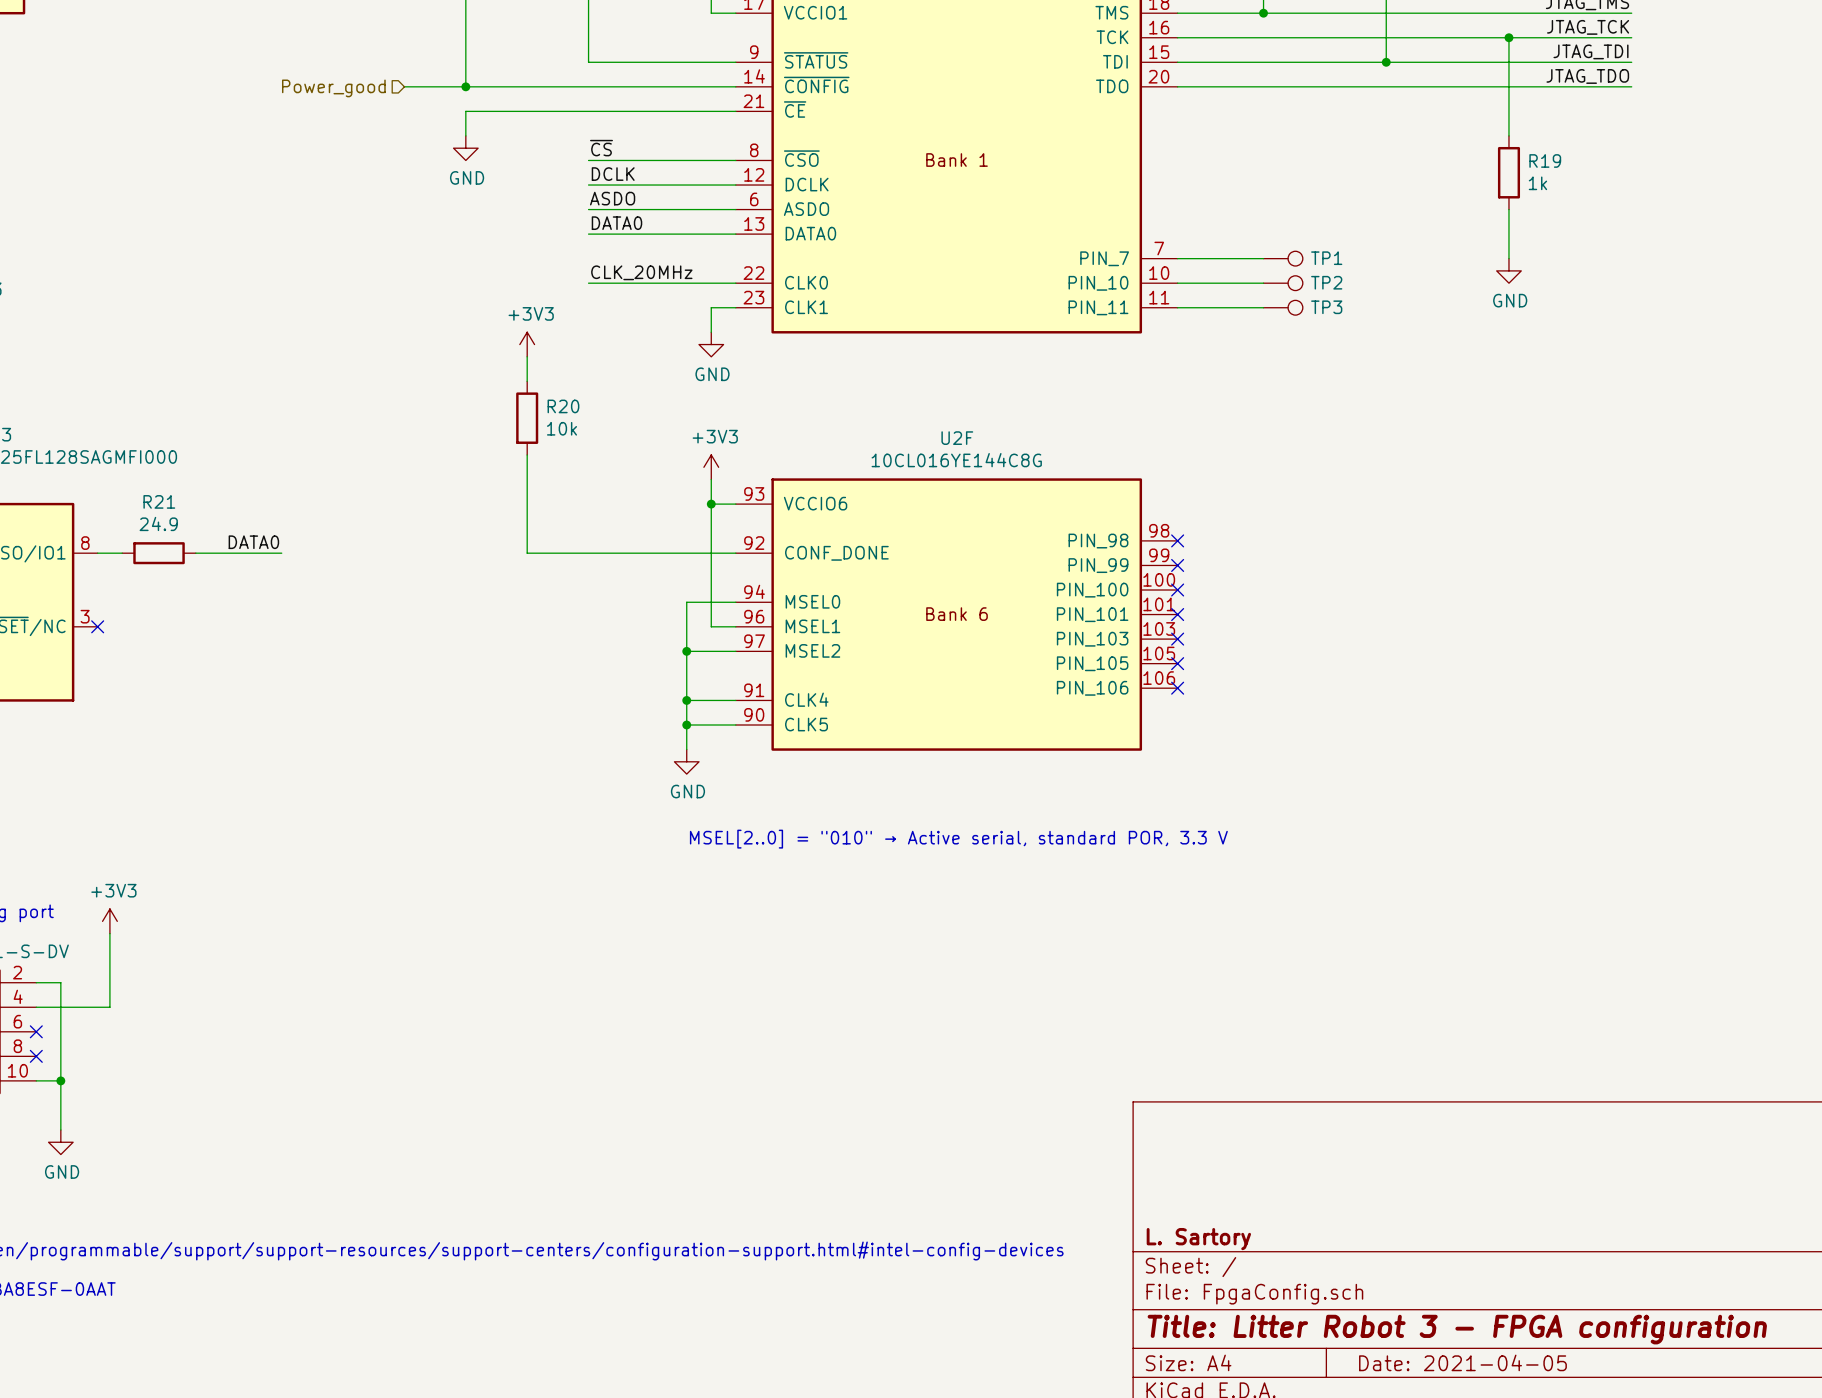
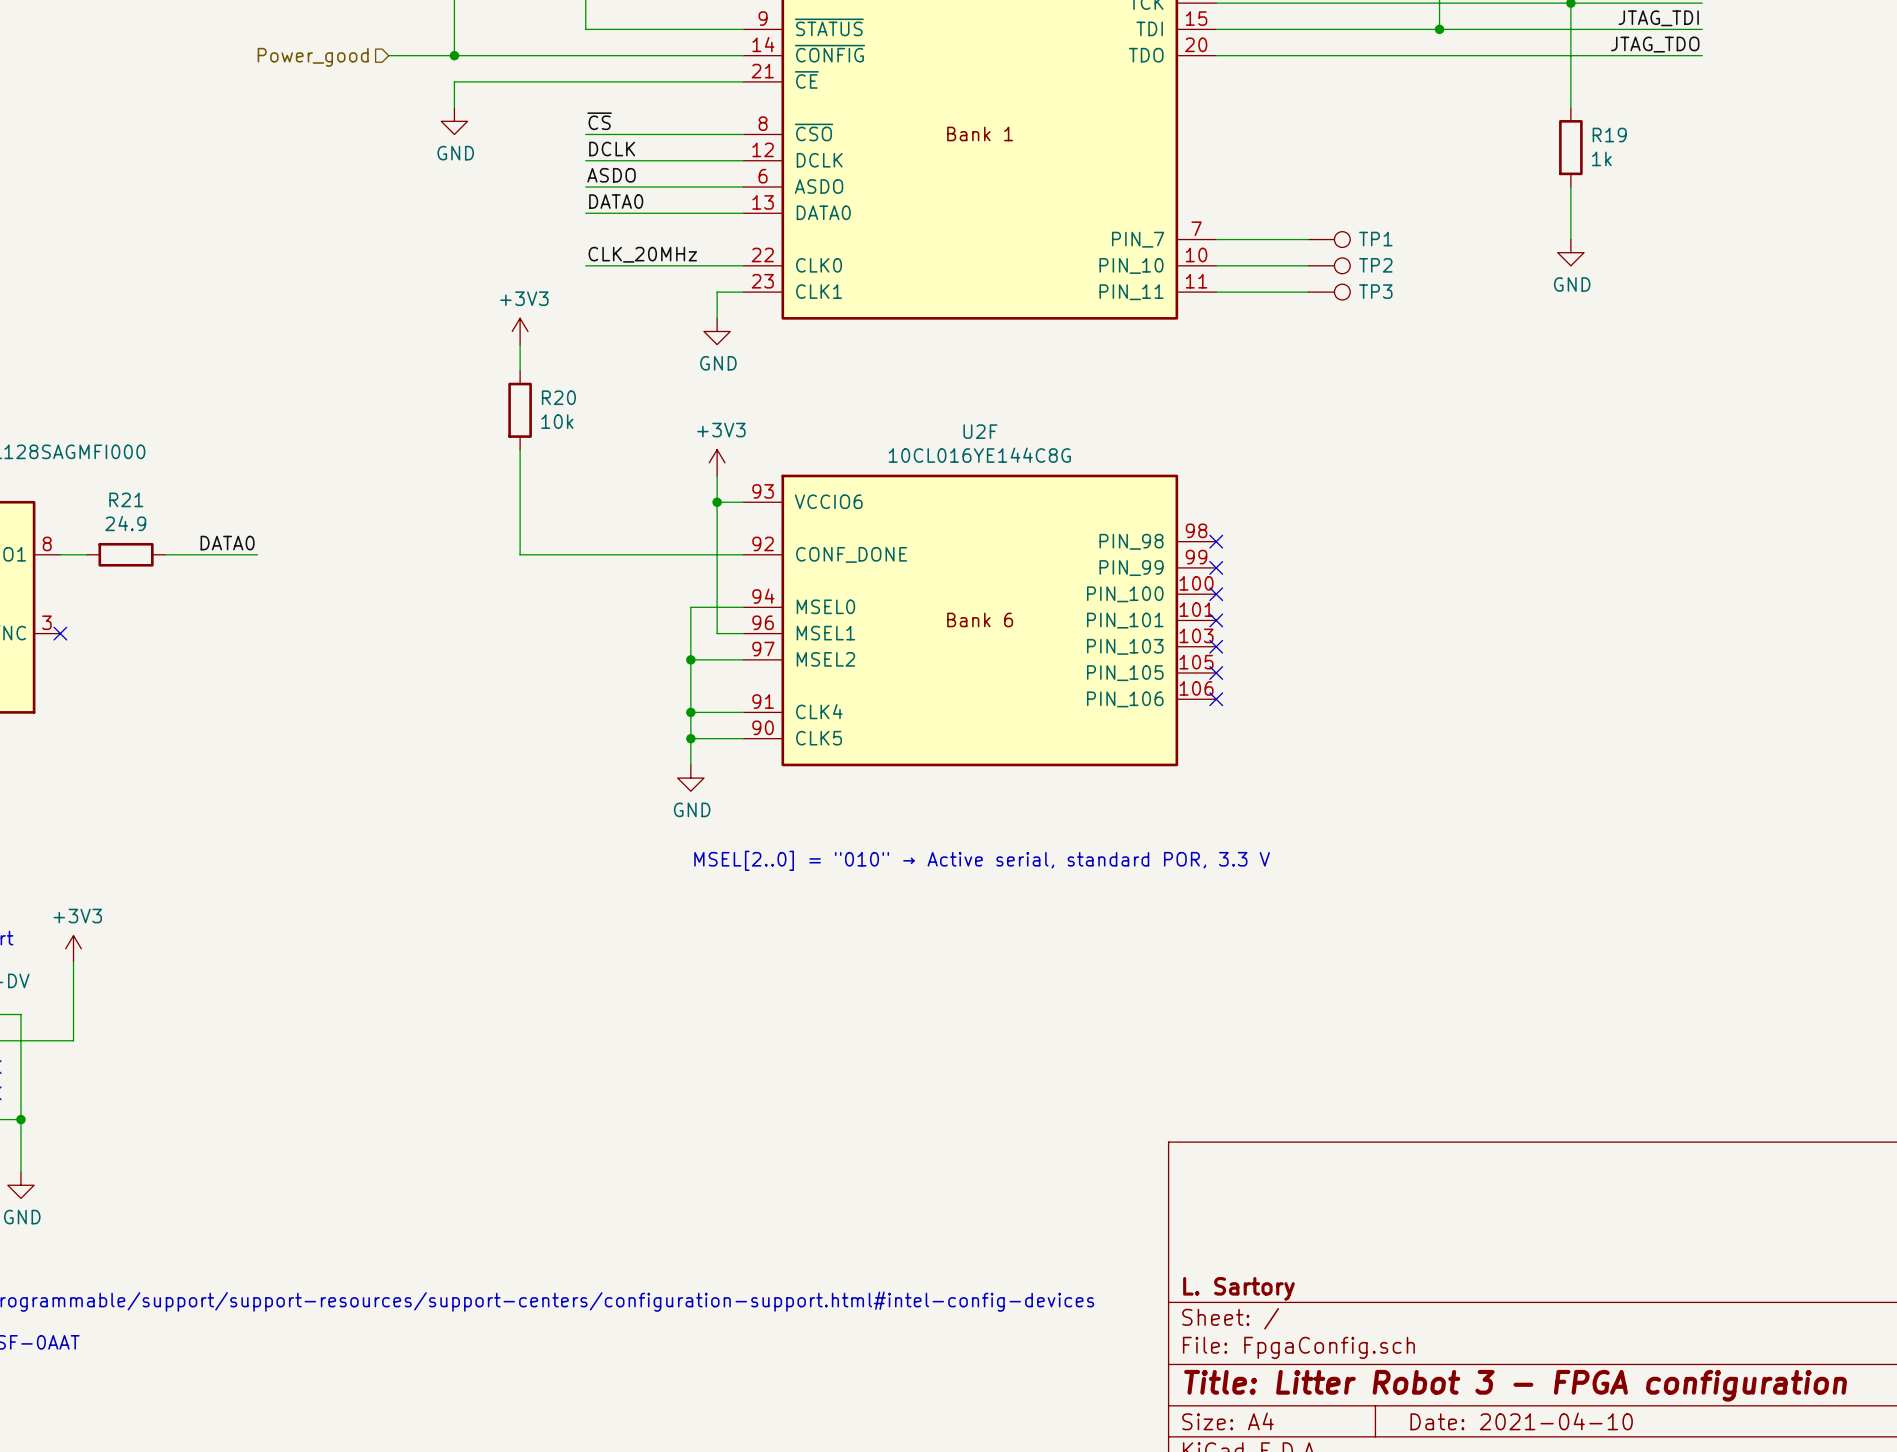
title block: Date: 2021-04-05 (1462, 1362) -> Date: 2021-04-10 (1521, 1421)

